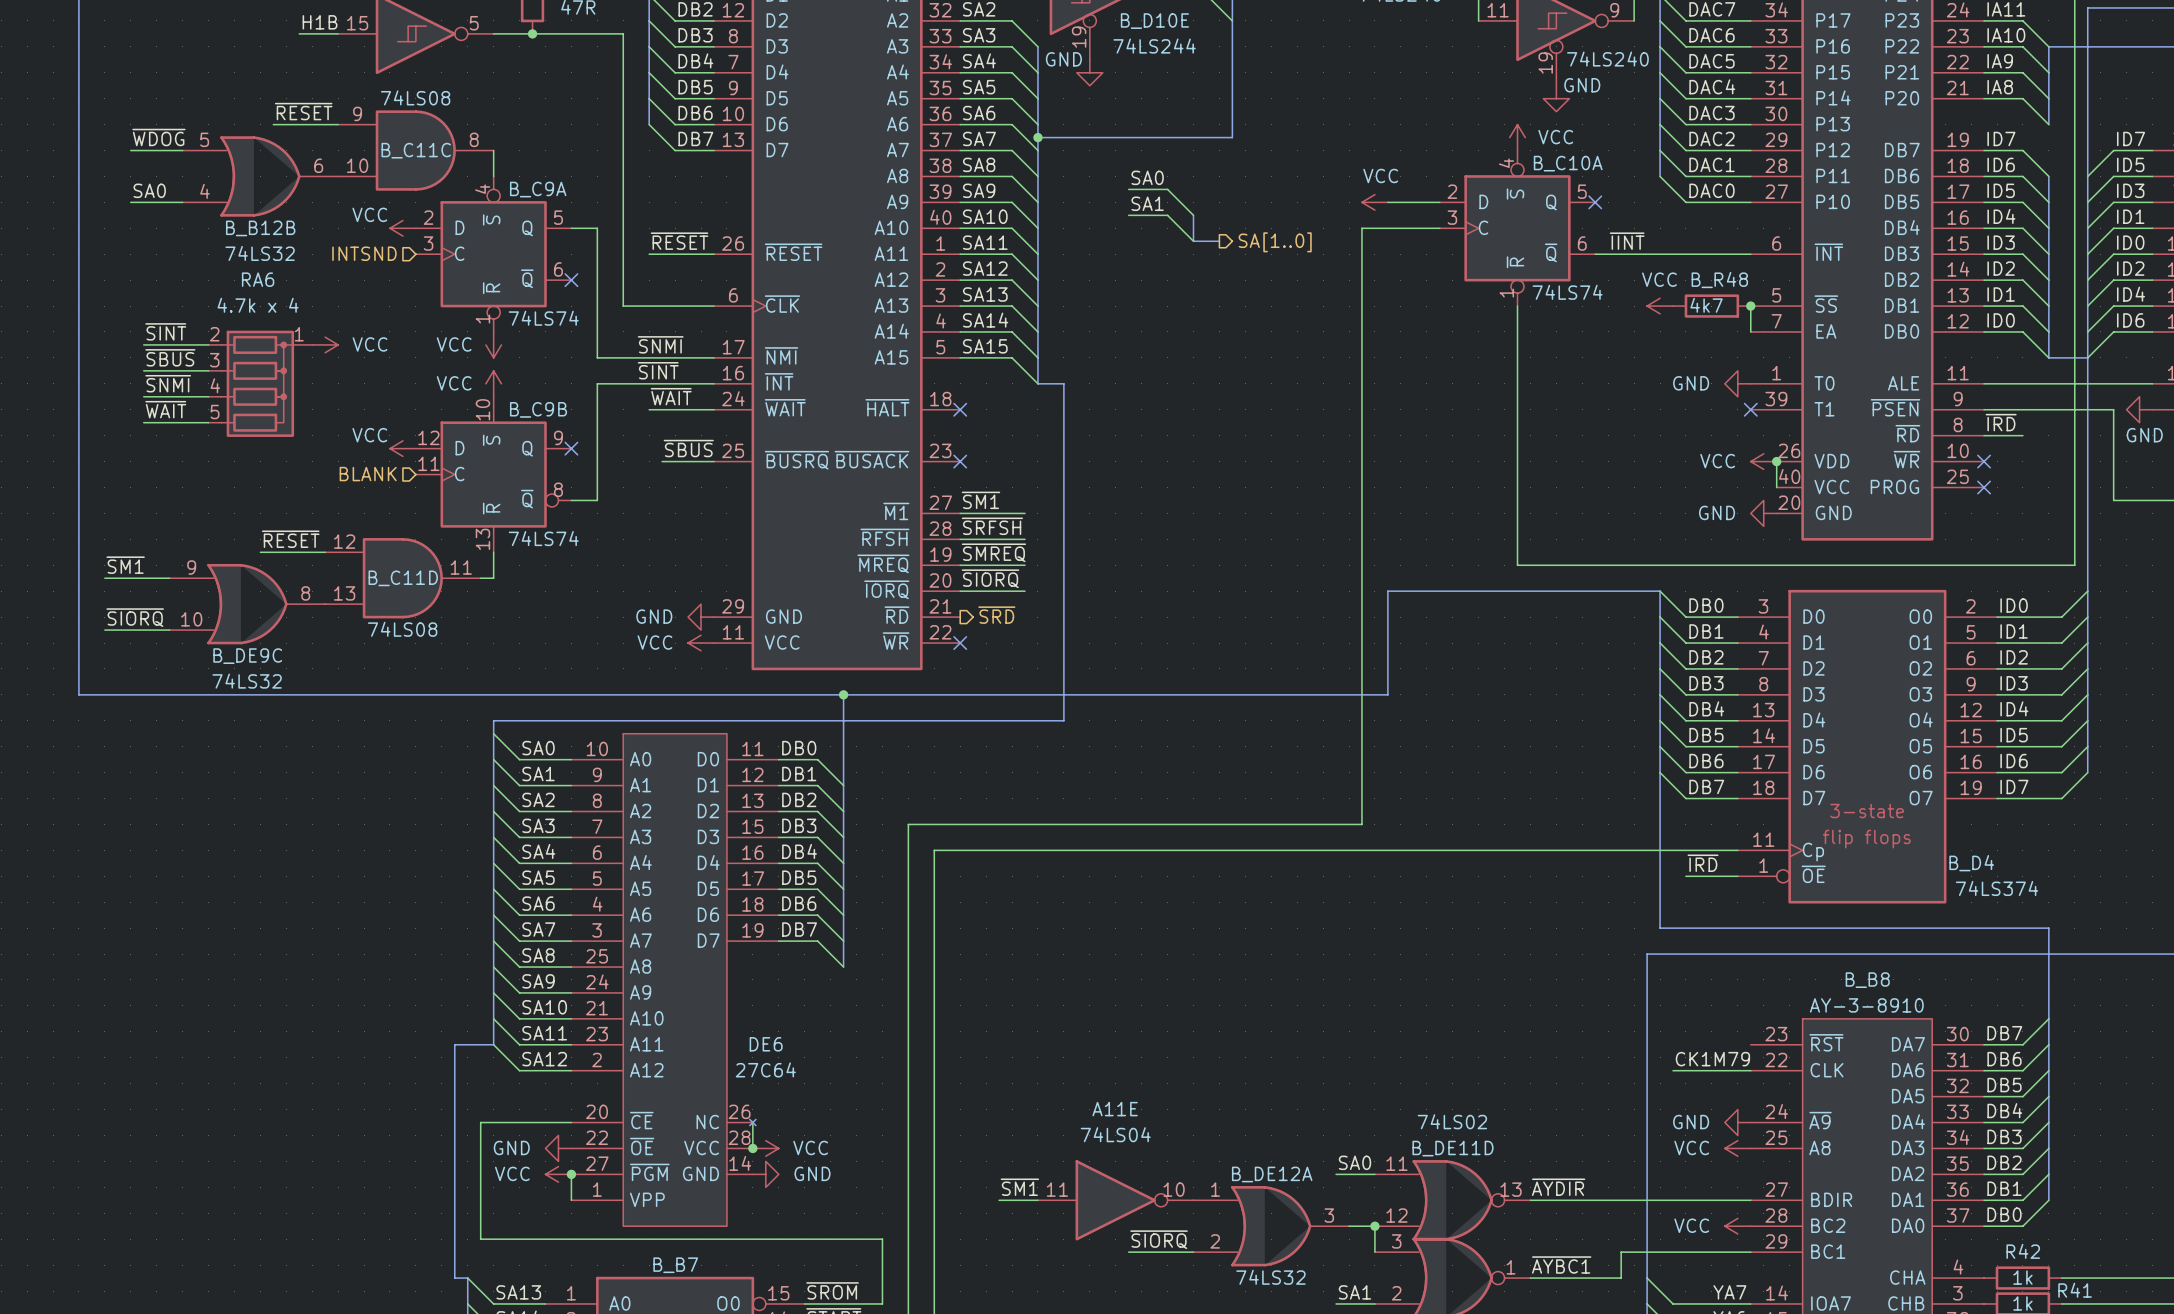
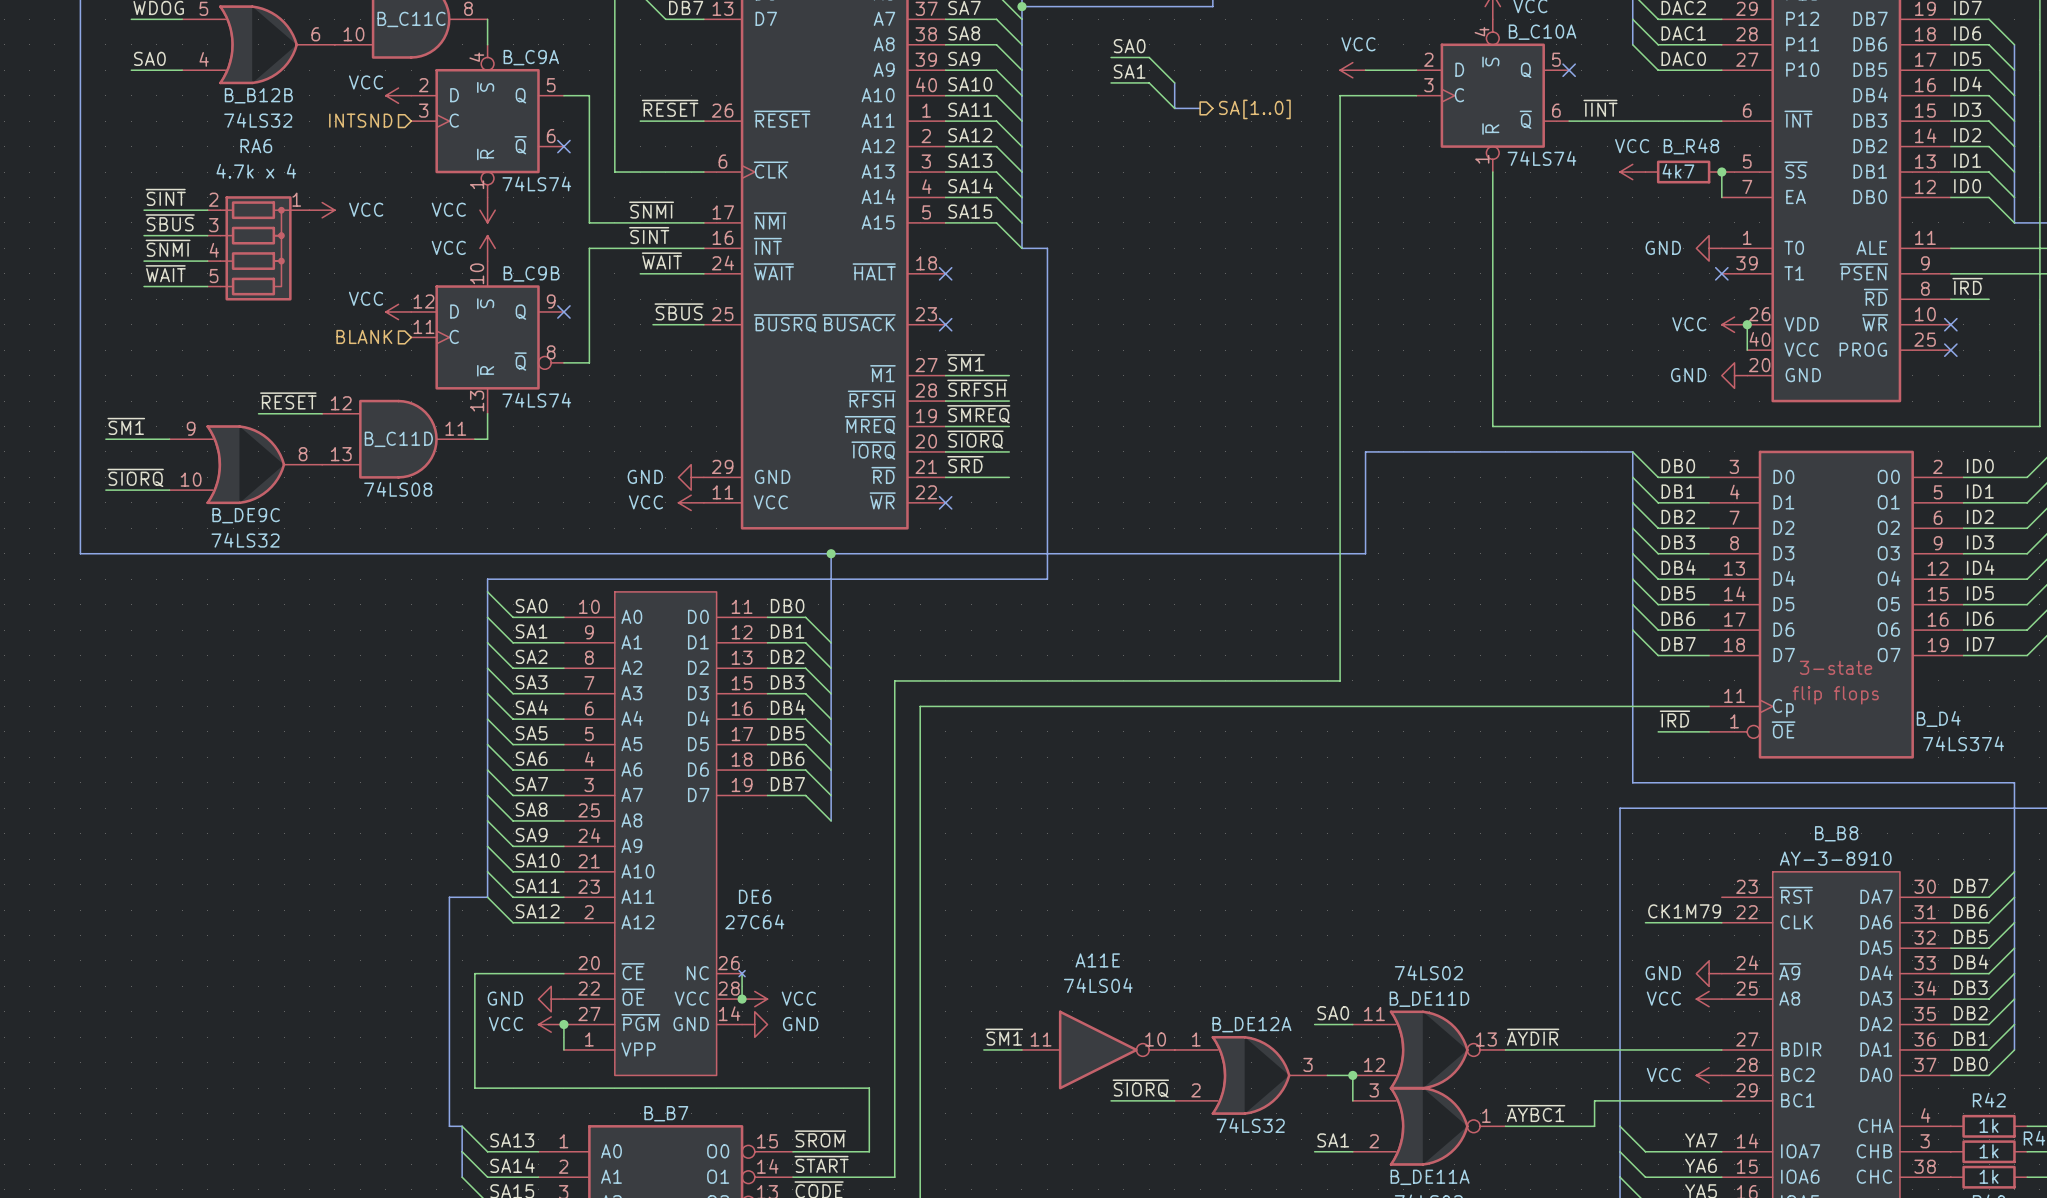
label: none -> ~{SRD} (965, 464)
hierarchical label: ~{SRD} (996, 615) -> none
wire: none -> (945, 477) (1009, 477)

